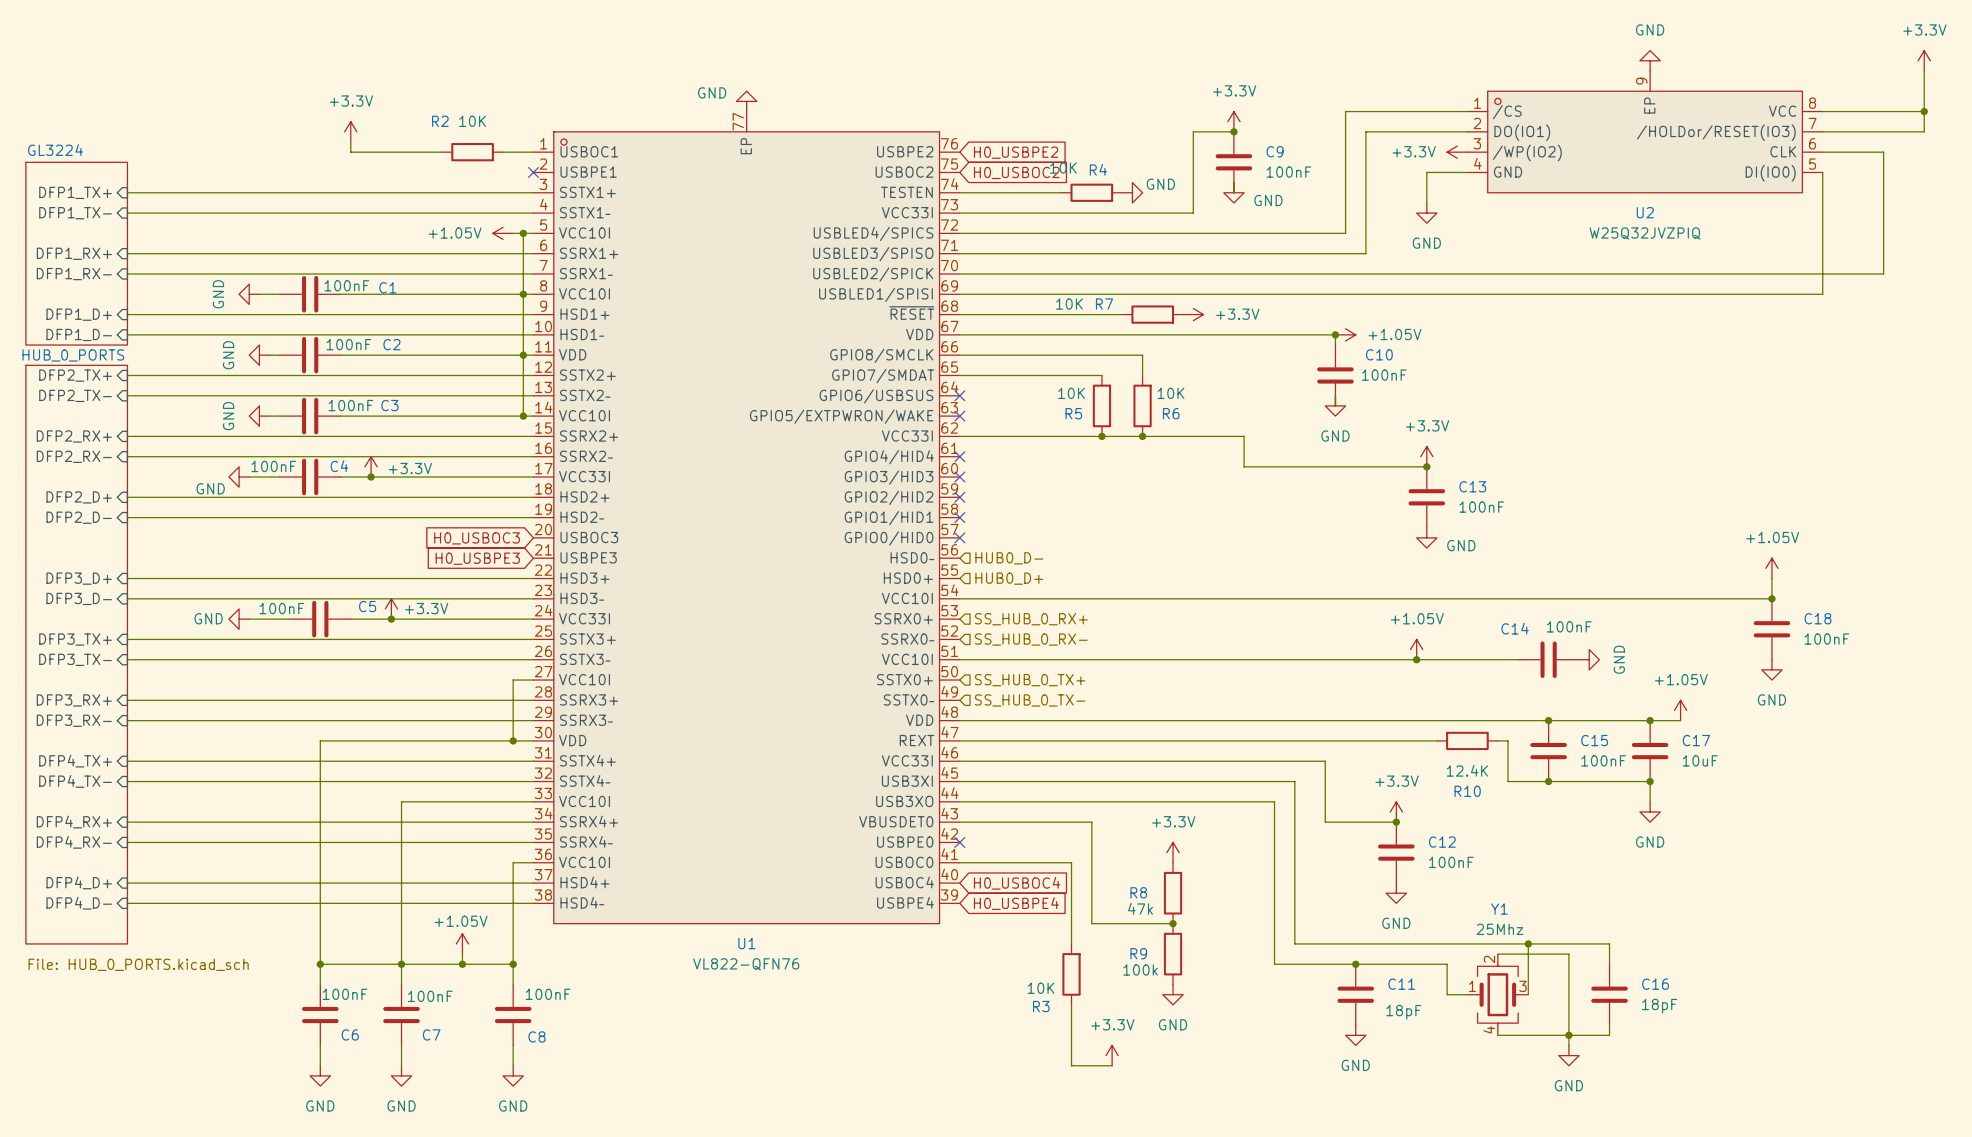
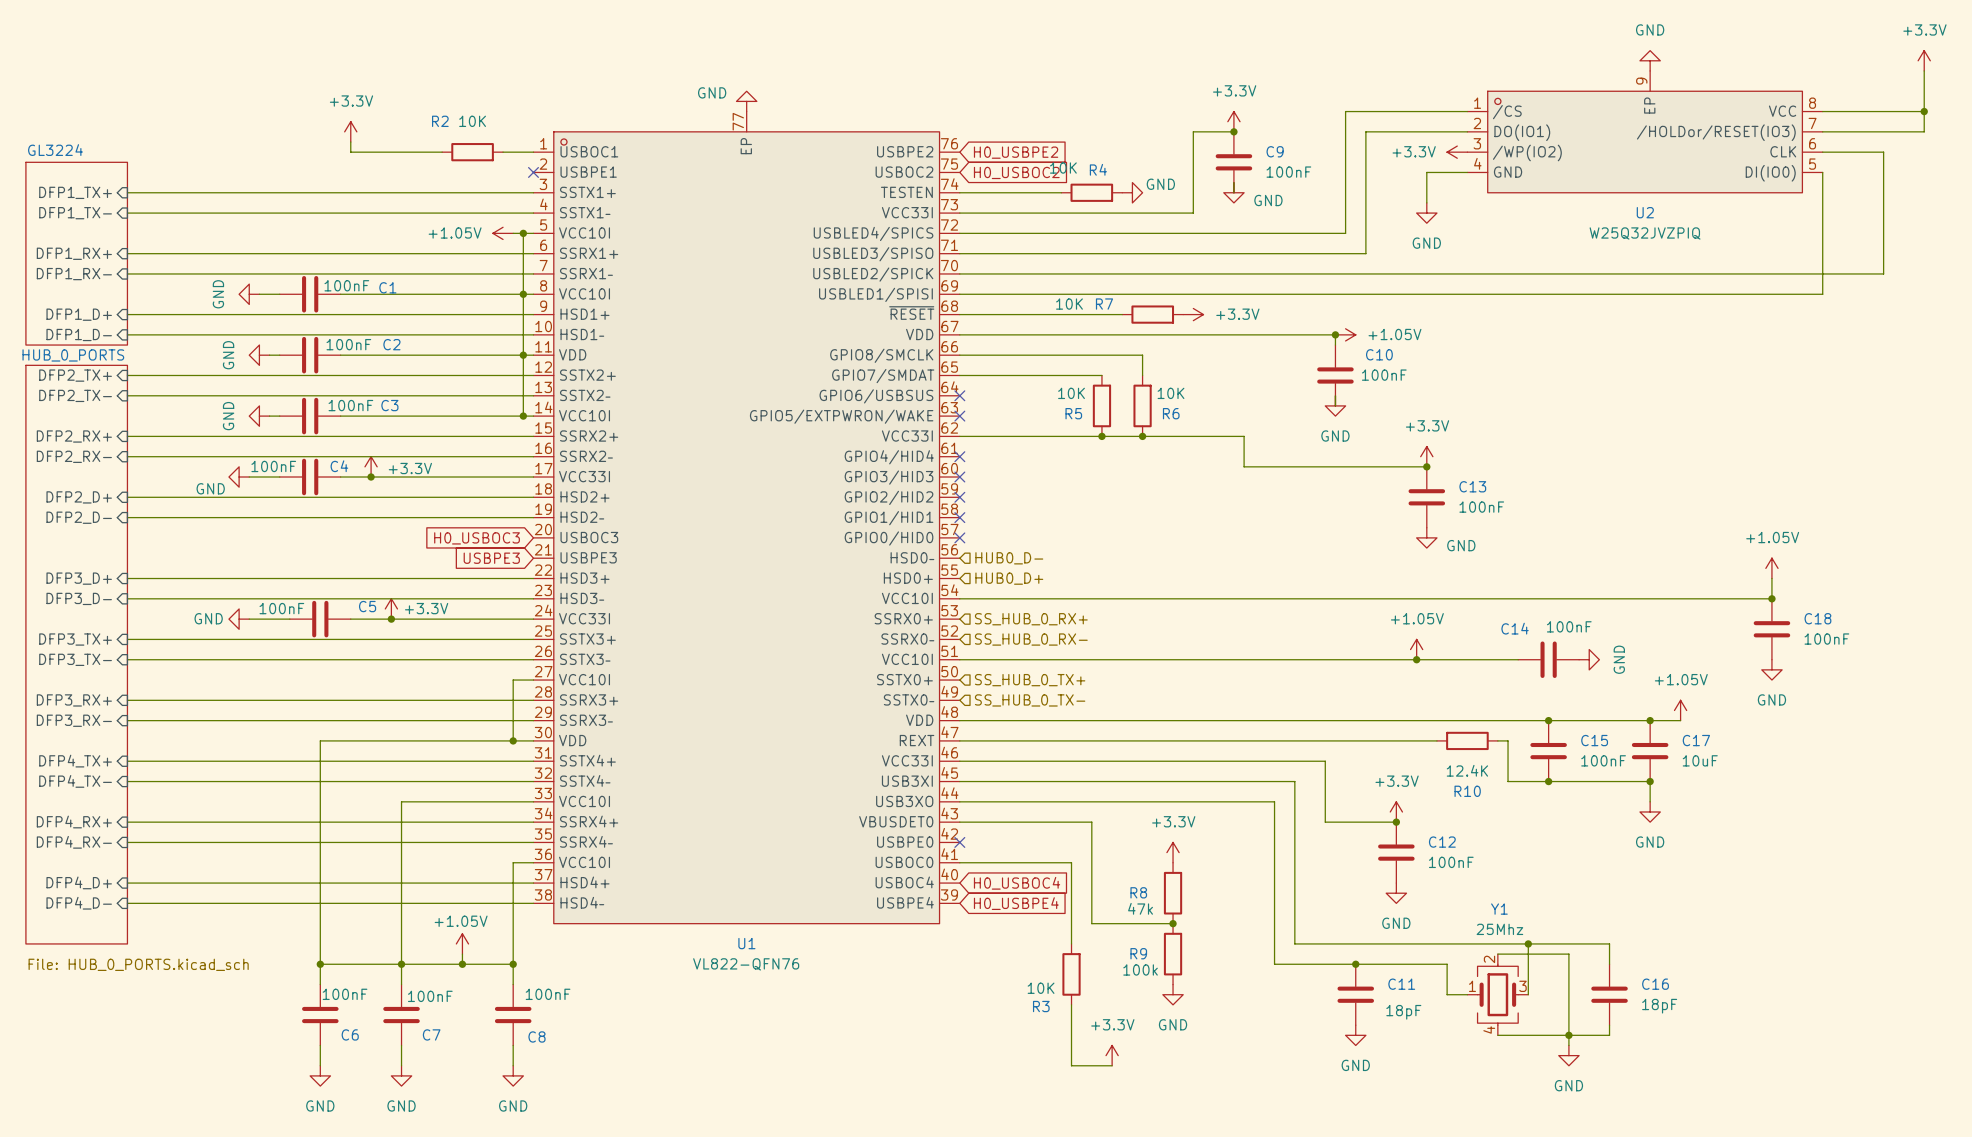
global label: H0_USBPE3 (477, 558) -> USBPE3 (491, 558)

